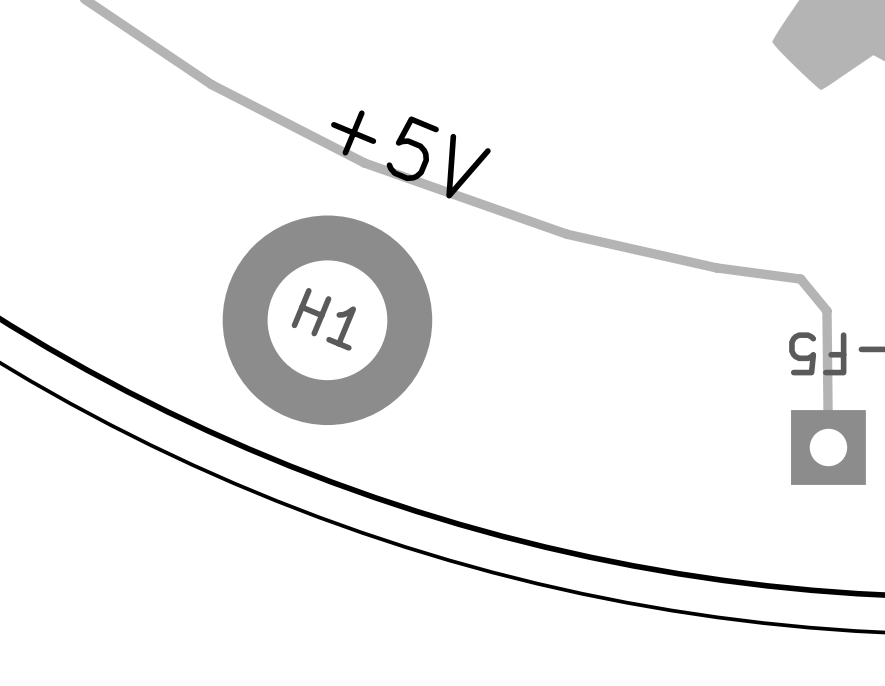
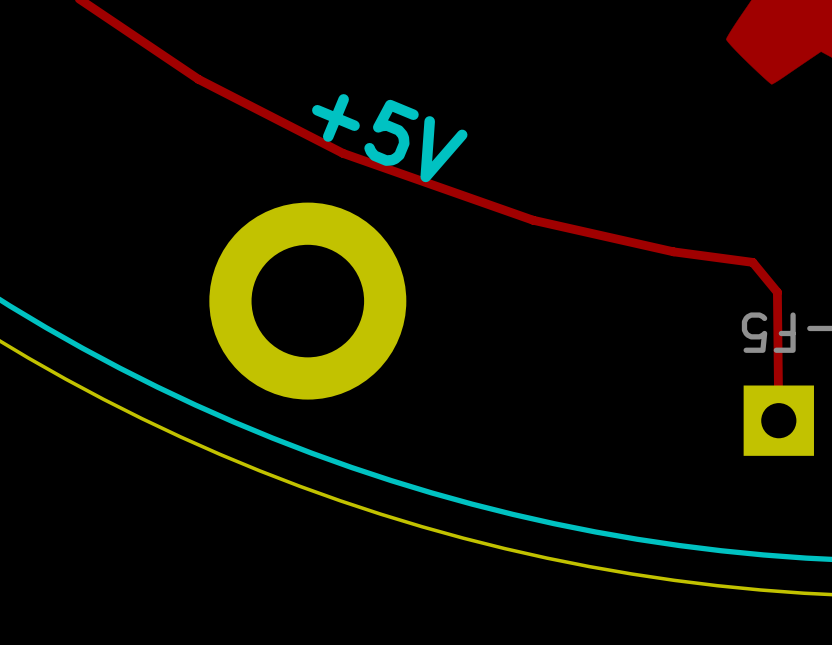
H1 value: +5V (410, 154) -> none
H1 name: H1 (323, 319) -> +5V (389, 138)

